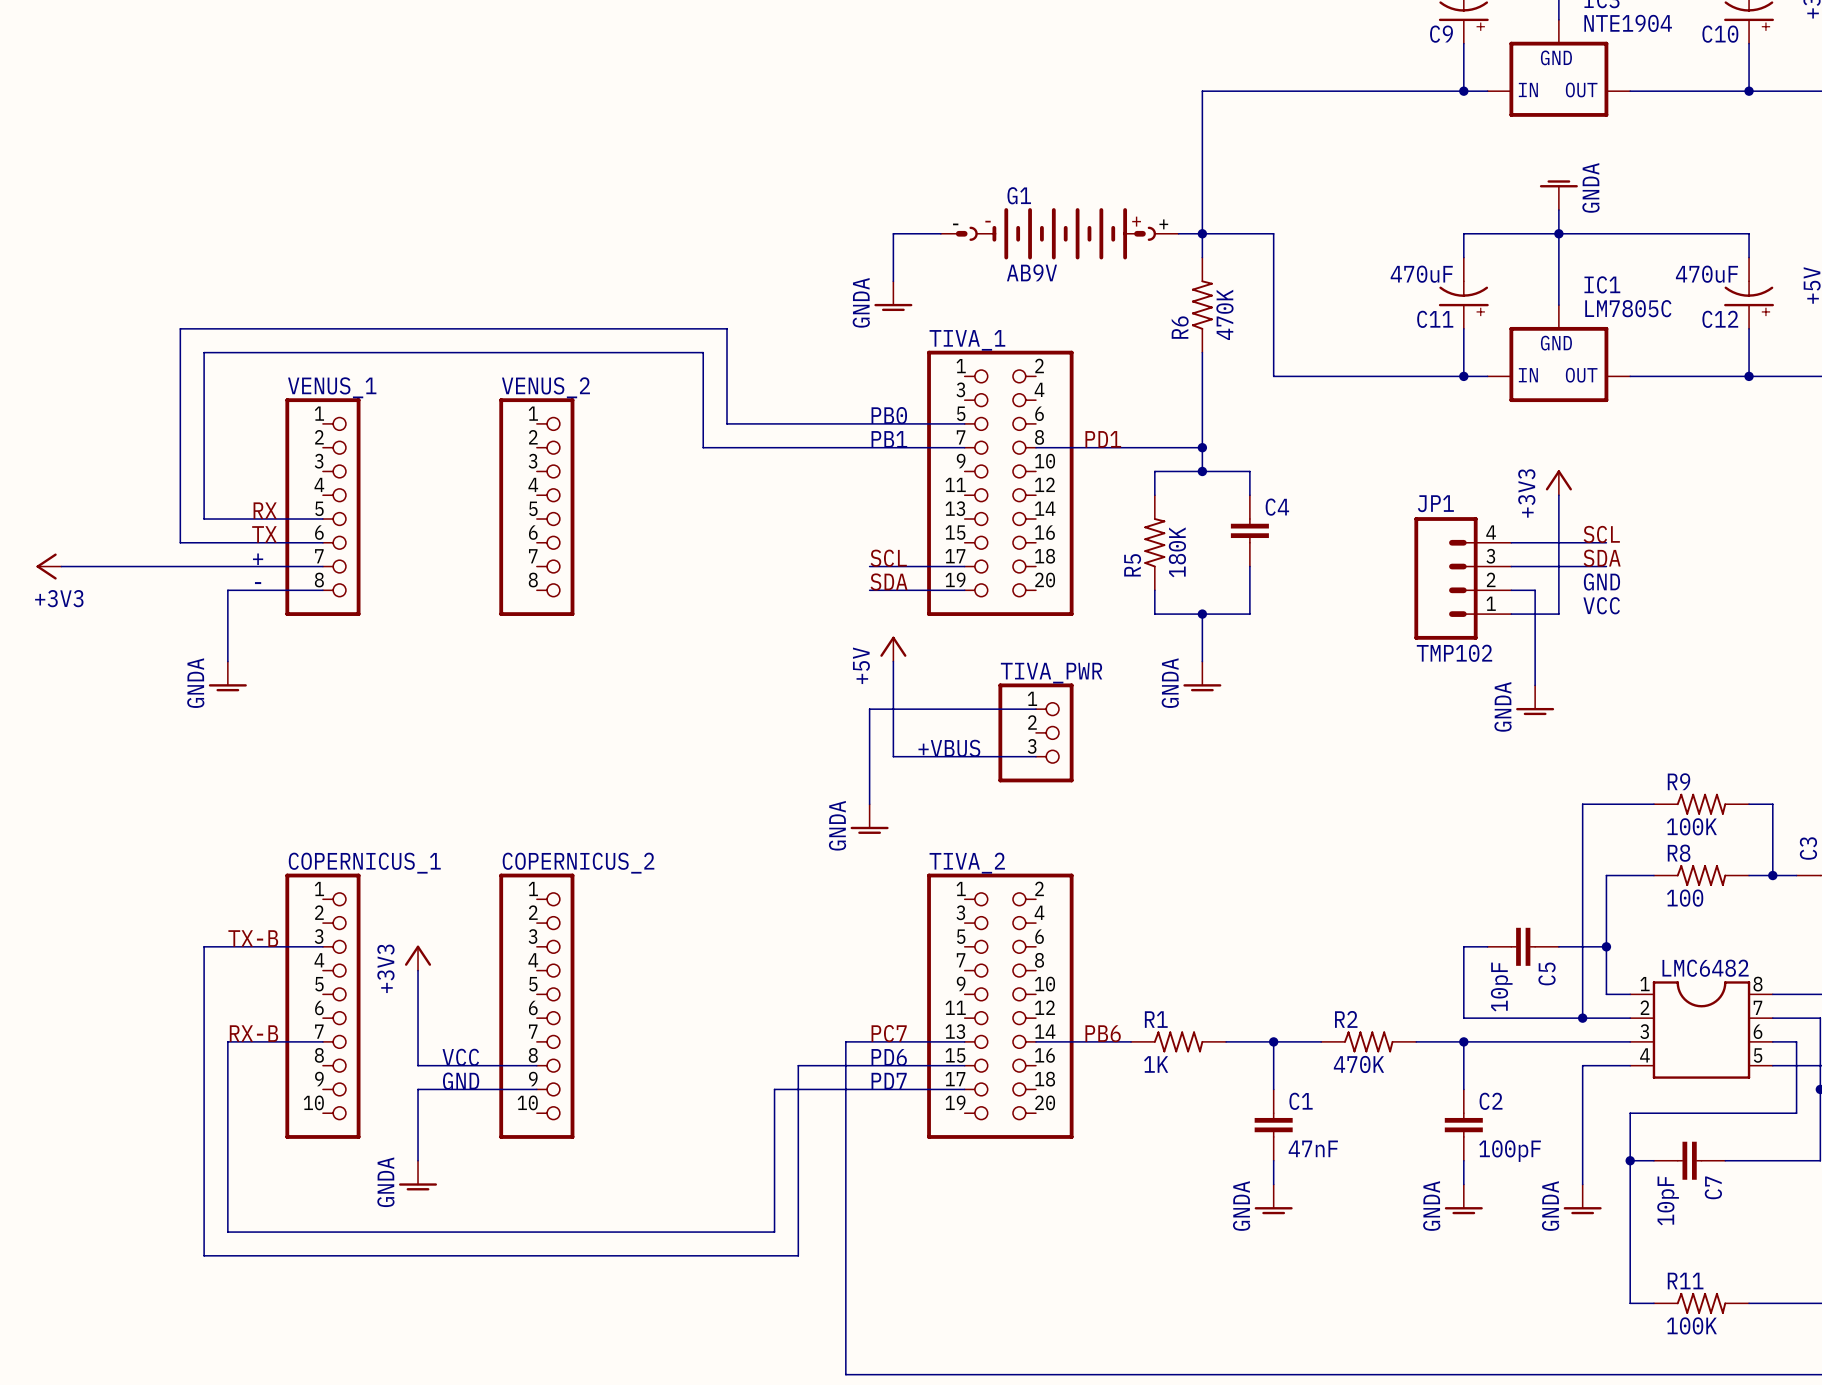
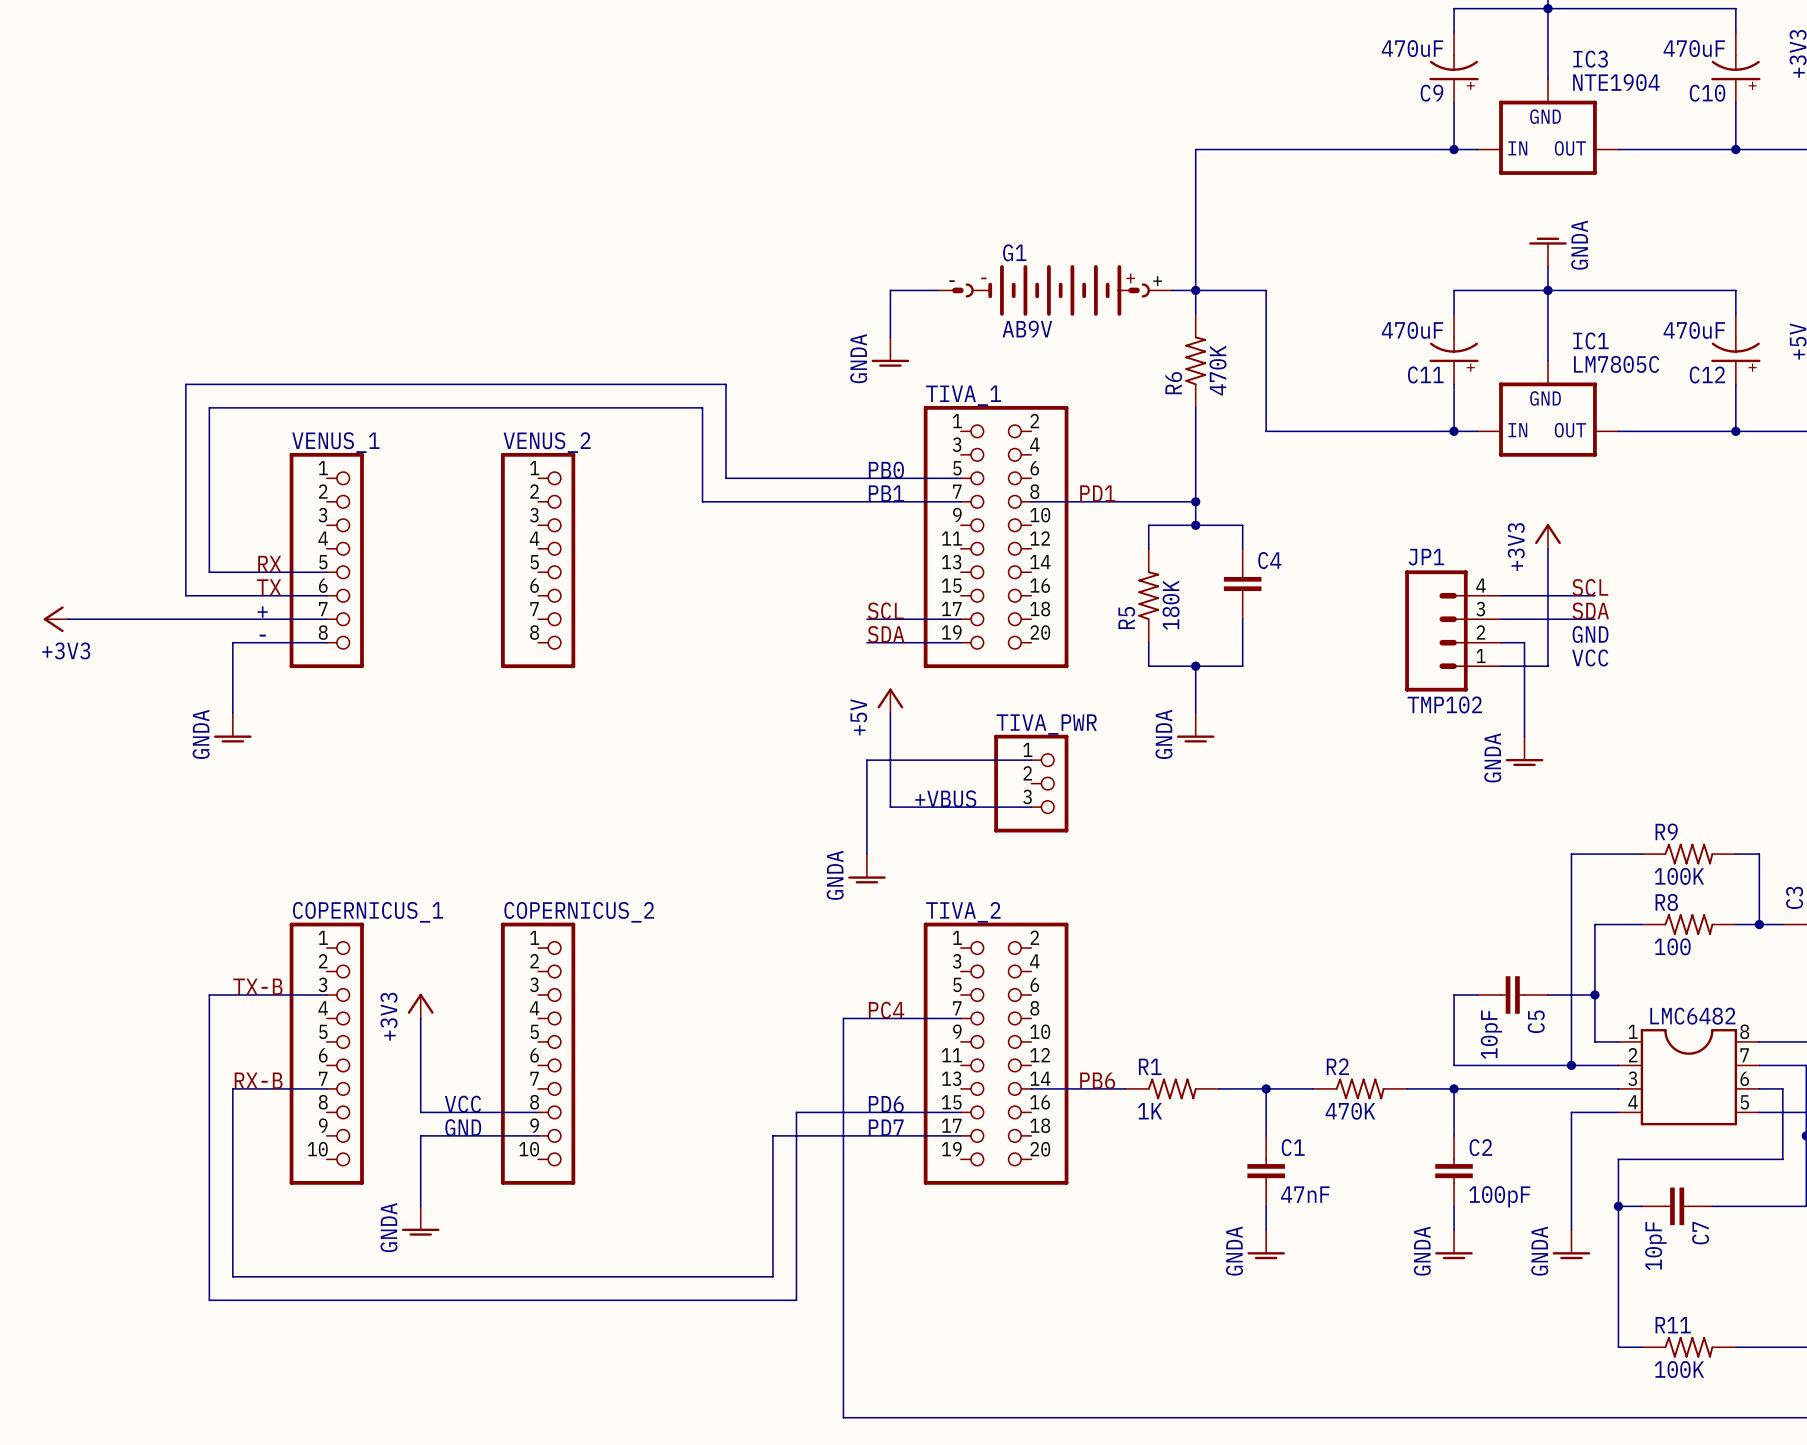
label: none -> PC4 (886, 1010)
label: PC7 (889, 1033) -> none
wire: (845, 1041) (964, 1041) -> (843, 1088) (843, 1018) (960, 1018)

